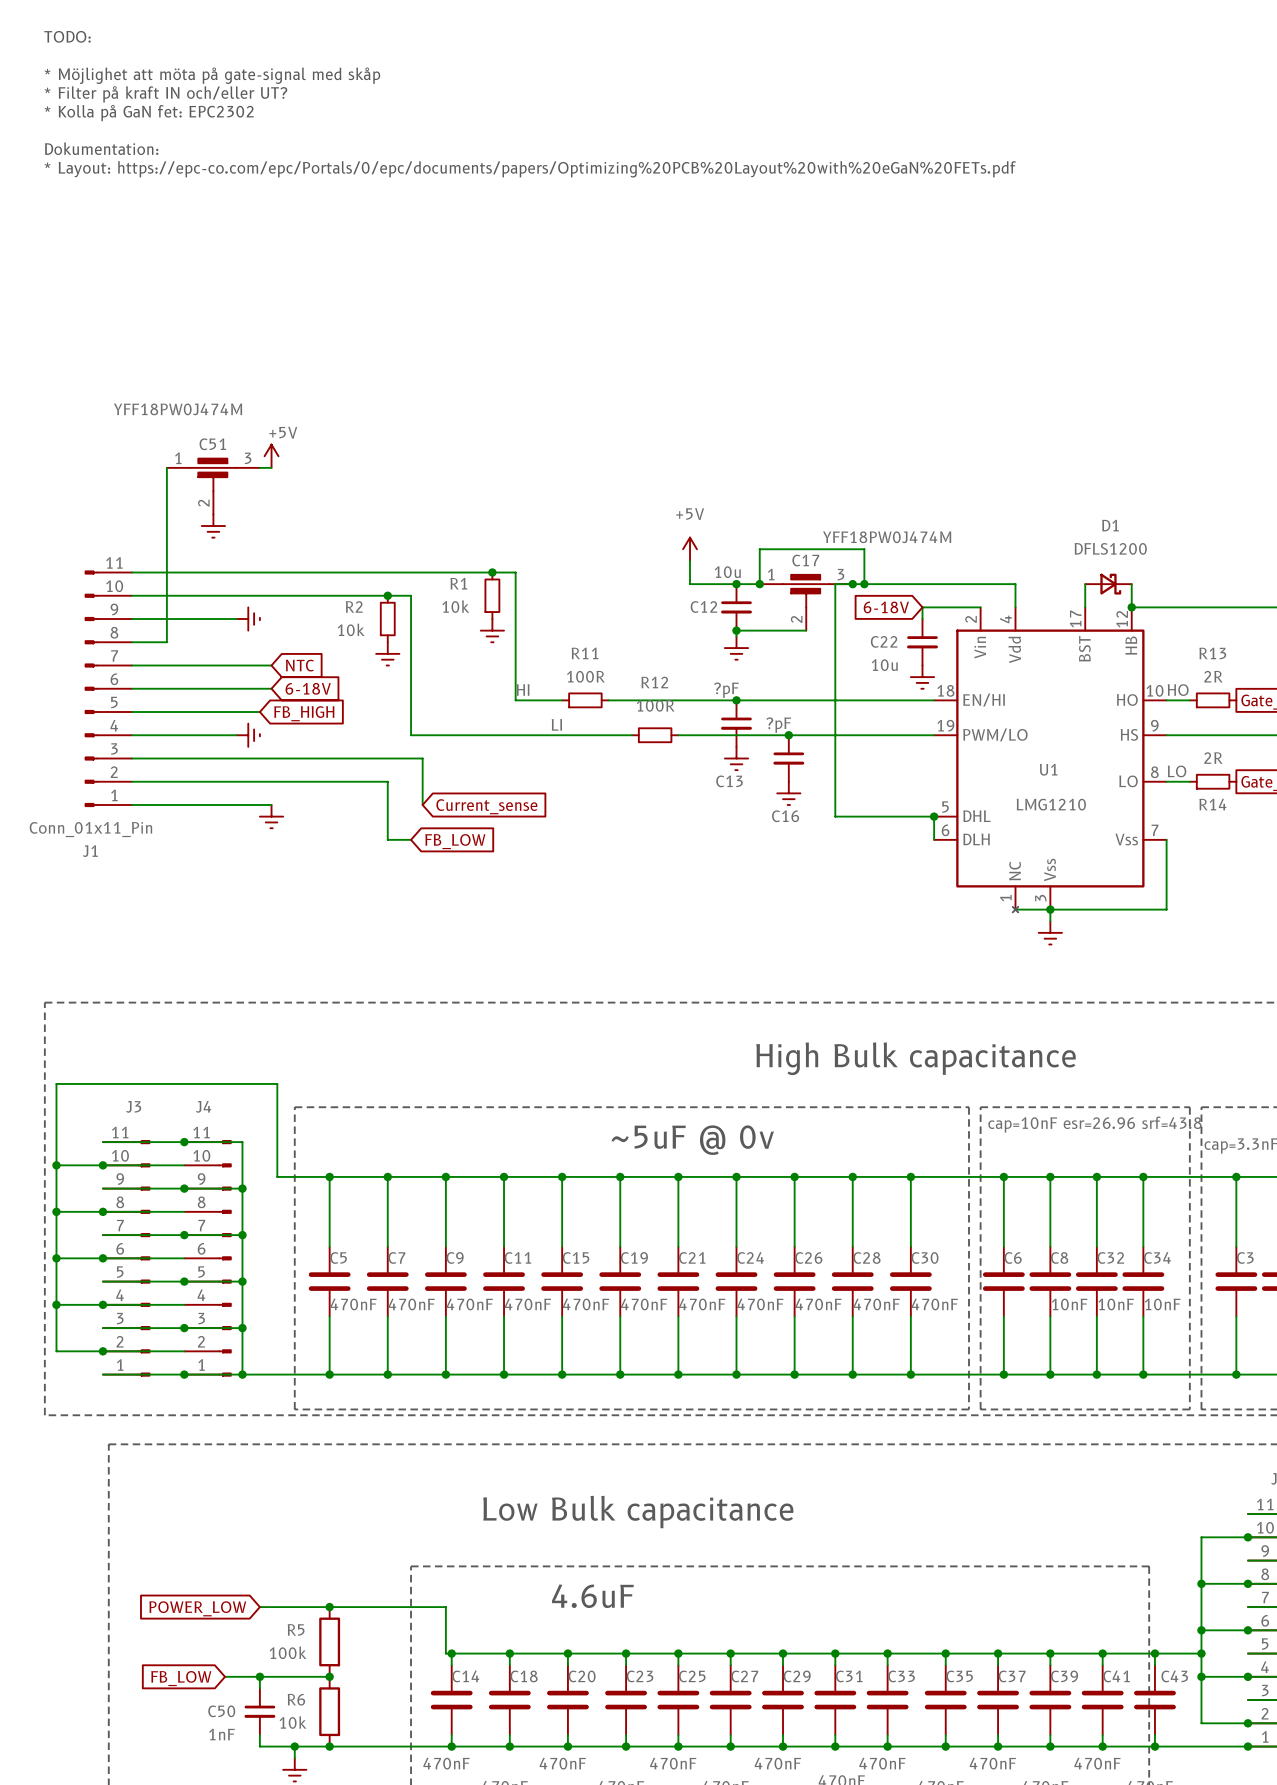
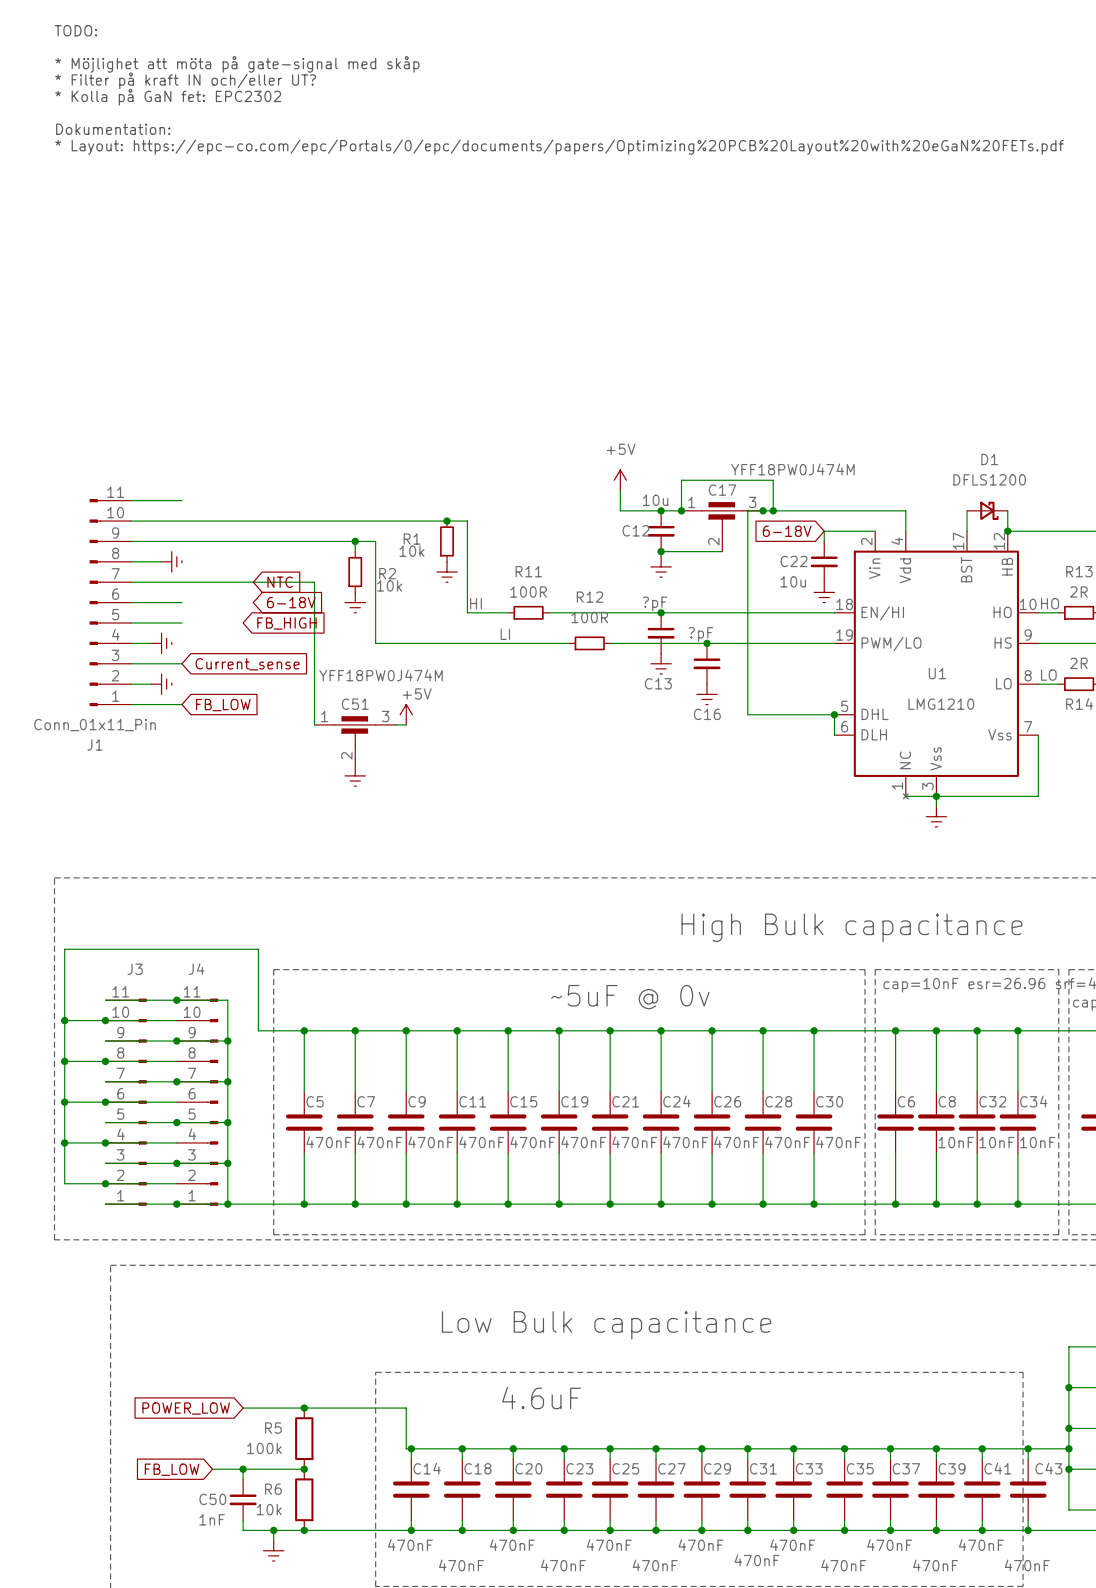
C51 value position: YFF18PW0J474M (178, 409) -> YFF18PW0J474M (381, 675)
power symbol: +5V (271, 456) -> none
wire: (166, 467) (166, 642) -> none
wire: (259, 467) (271, 467) -> none
C51 position: (213, 486) -> (355, 741)
power symbol: (213, 526) -> none
wire: (190, 572) (515, 572) (515, 595) -> none
junction position: (492, 572) -> (447, 521)
R1 name position: R1 (458, 583) -> R1 (412, 539)
junction position: (387, 595) -> (355, 541)
wire: (411, 595) (411, 619) -> (375, 521) (467, 521)
R1 position: (492, 595) -> (447, 541)
R2 name position: R2 (354, 606) -> R2 (387, 573)
wire: none -> (222, 541) (375, 541)
power symbol: (248, 619) -> none
wire: none -> (355, 541) (355, 551)
R2 position: (387, 619) -> (355, 572)
R2 value position: 10k (351, 629) -> 10k (389, 585)
power symbol position: (492, 630) -> (447, 572)
power symbol: none -> (171, 561)
power symbol position: (387, 653) -> (355, 602)
wire: none -> (253, 582) (314, 582) (314, 724)
wire: (190, 688) (271, 688) -> none
wire: (190, 712) (259, 712) -> none
wire: (155, 735) (236, 735) -> none
power symbol: none -> (161, 643)
power symbol: (248, 735) -> none
wire: (190, 758) (422, 758) (422, 804) -> none
global label: none -> Current_sense (247, 664)
wire: (155, 781) (387, 781) (387, 839) (411, 839) -> none
power symbol: none -> (161, 684)
wire: (190, 804) (271, 804) -> none
global label: Current_sense (486, 806) -> none
power symbol: (271, 816) -> none
power symbol: none -> +5V (406, 714)
wire: none -> (396, 724) (406, 724)
global label position: FB_LOW (455, 841) -> FB_LOW (223, 705)
power symbol: none -> (355, 775)

